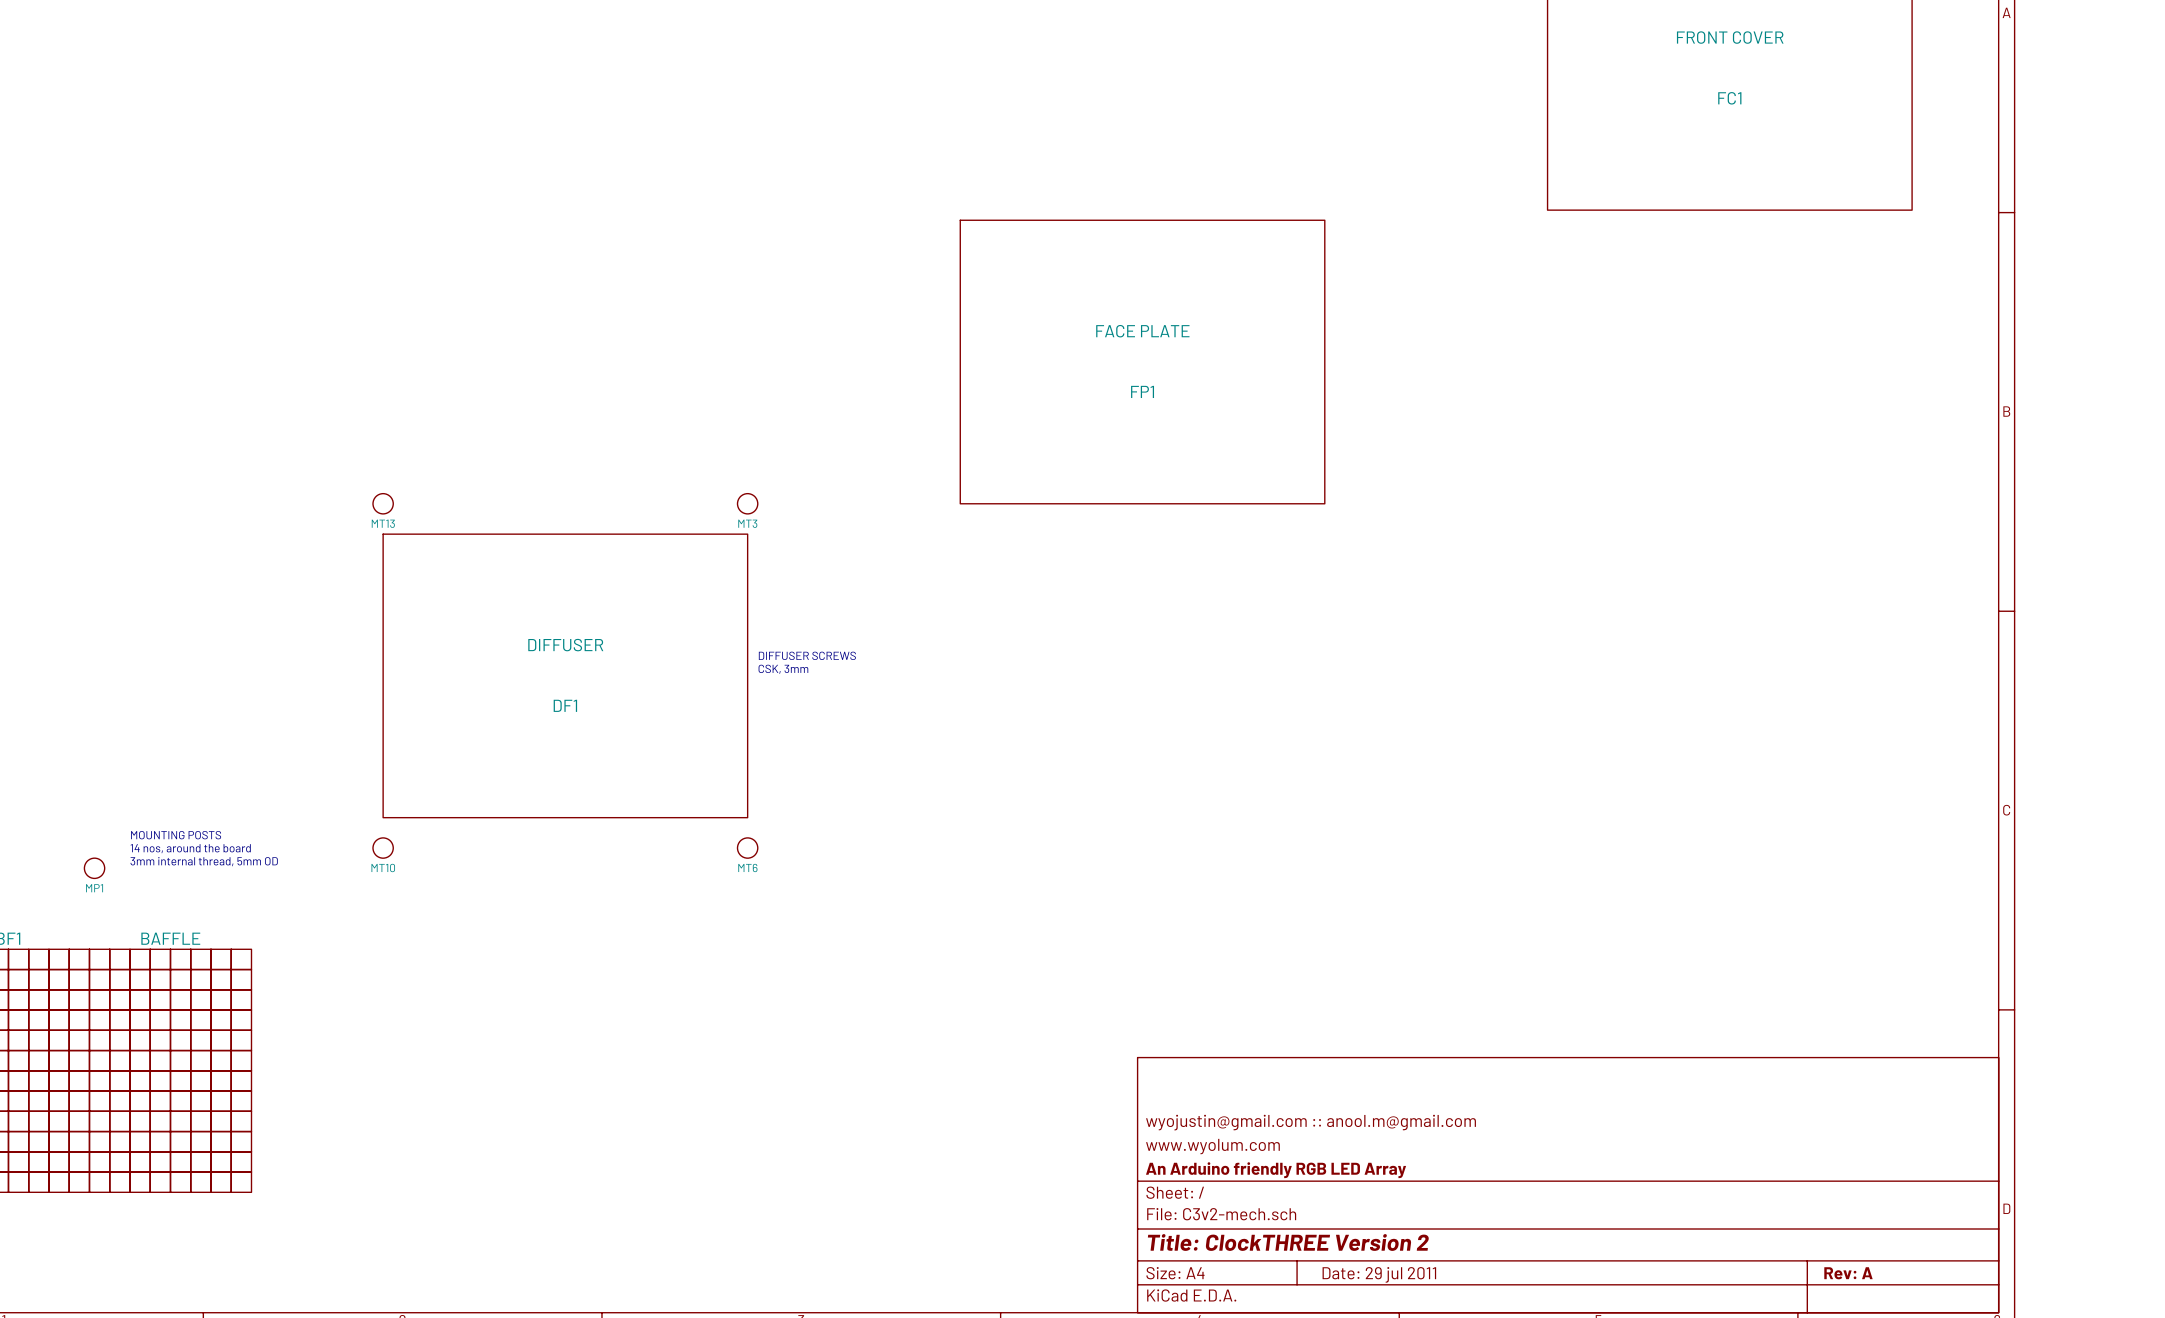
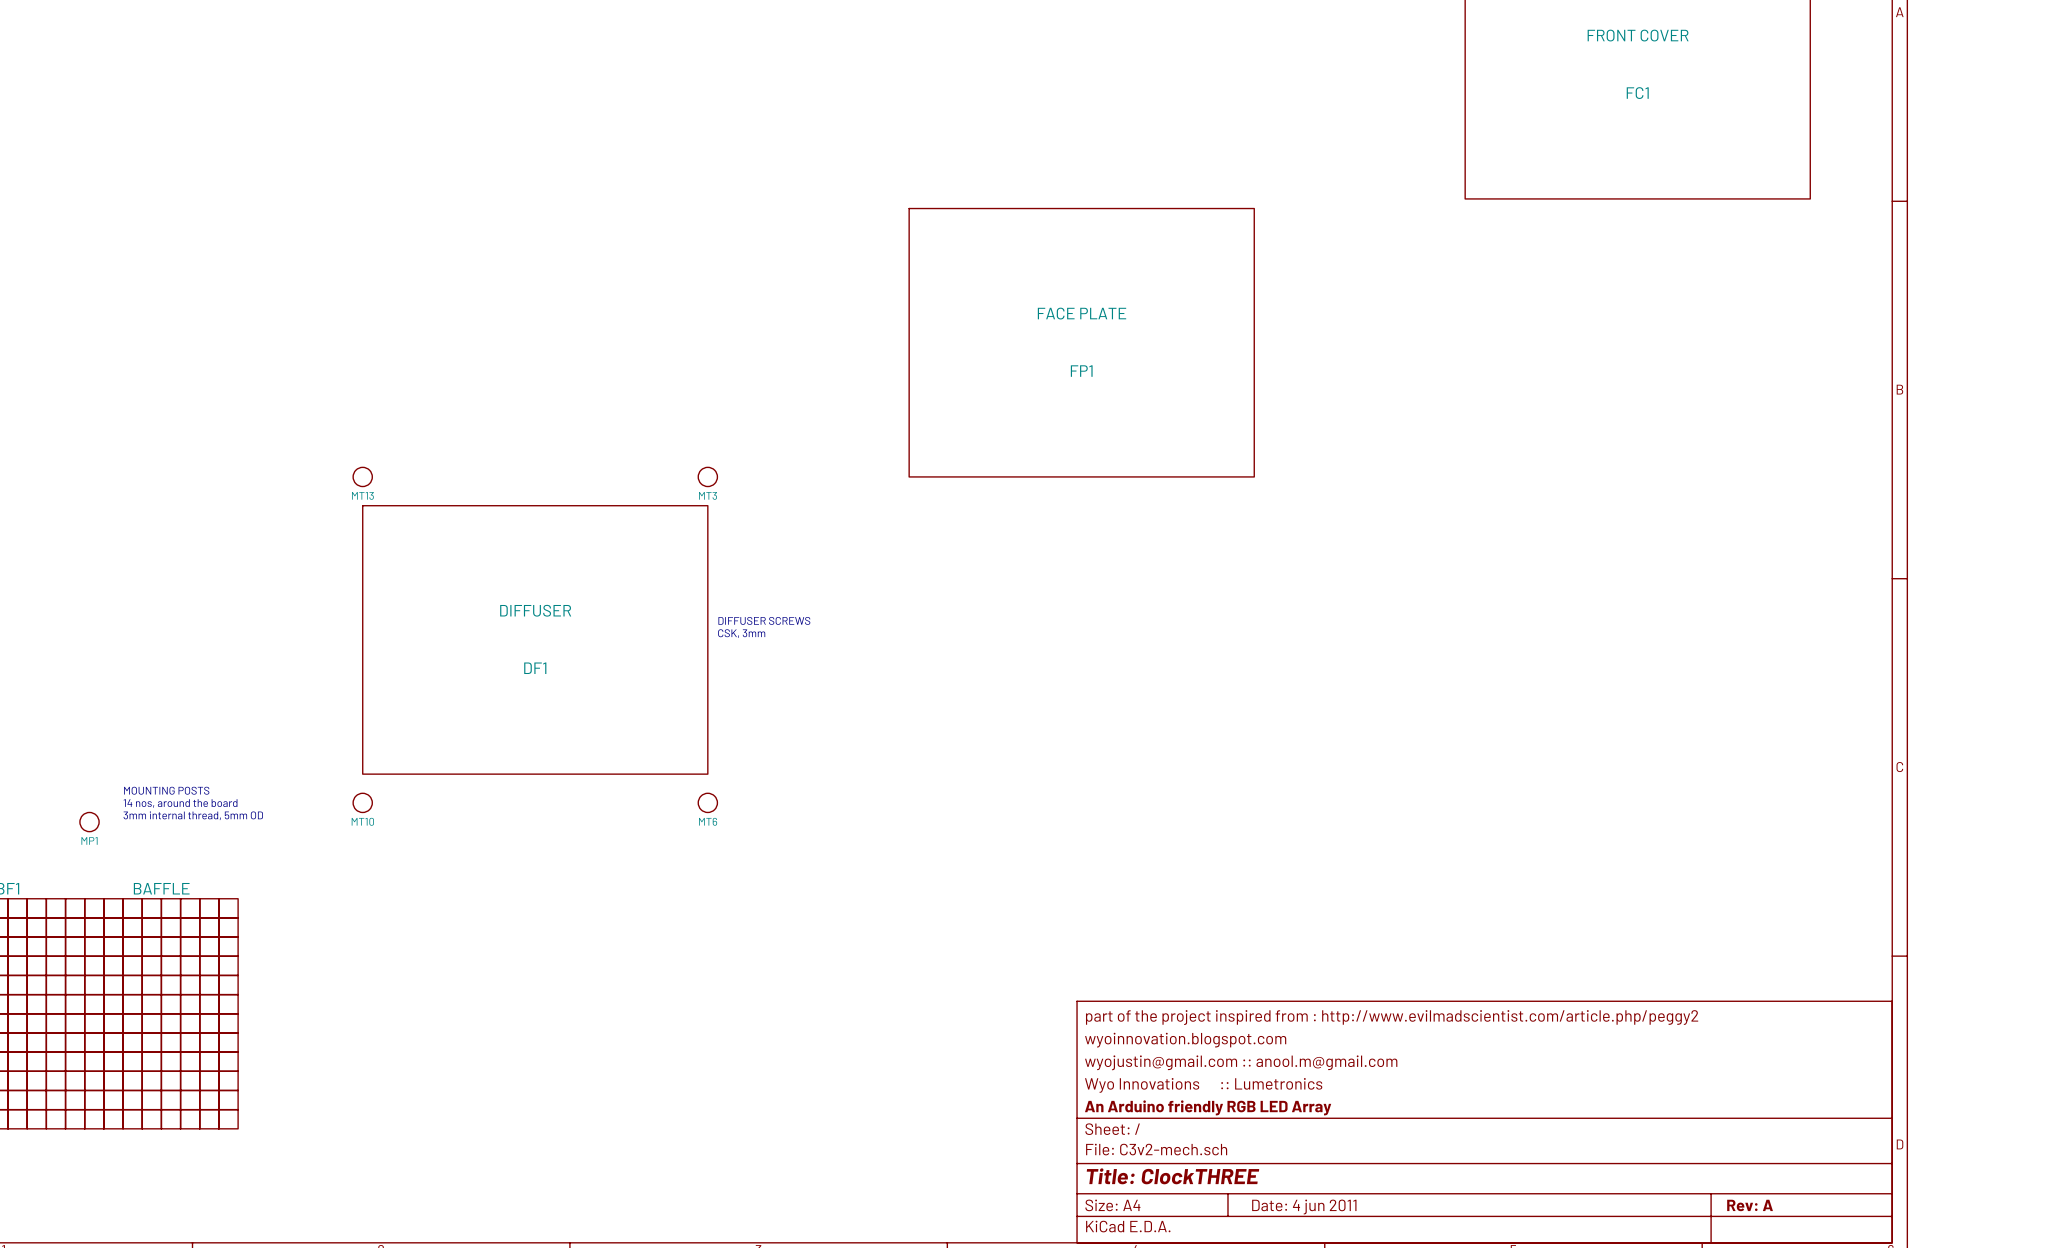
title block: none -> part of the project inspired from : http://www.evilmadscientist.com/article.php/peggy2 (1392, 1017)
title block: none -> wyoinnovation.blogspot.com (1185, 1040)
title block: www.wyolum.com (1212, 1146) -> Wyo Innovations :: Lumetronics (1203, 1085)
title block: Title: ClockTHREE Version 2 (1288, 1242) -> Title: ClockTHREE (1172, 1176)
title block: Date: 29 jul 2011 (1379, 1274) -> Date: 4 jun 2011 (1304, 1207)

